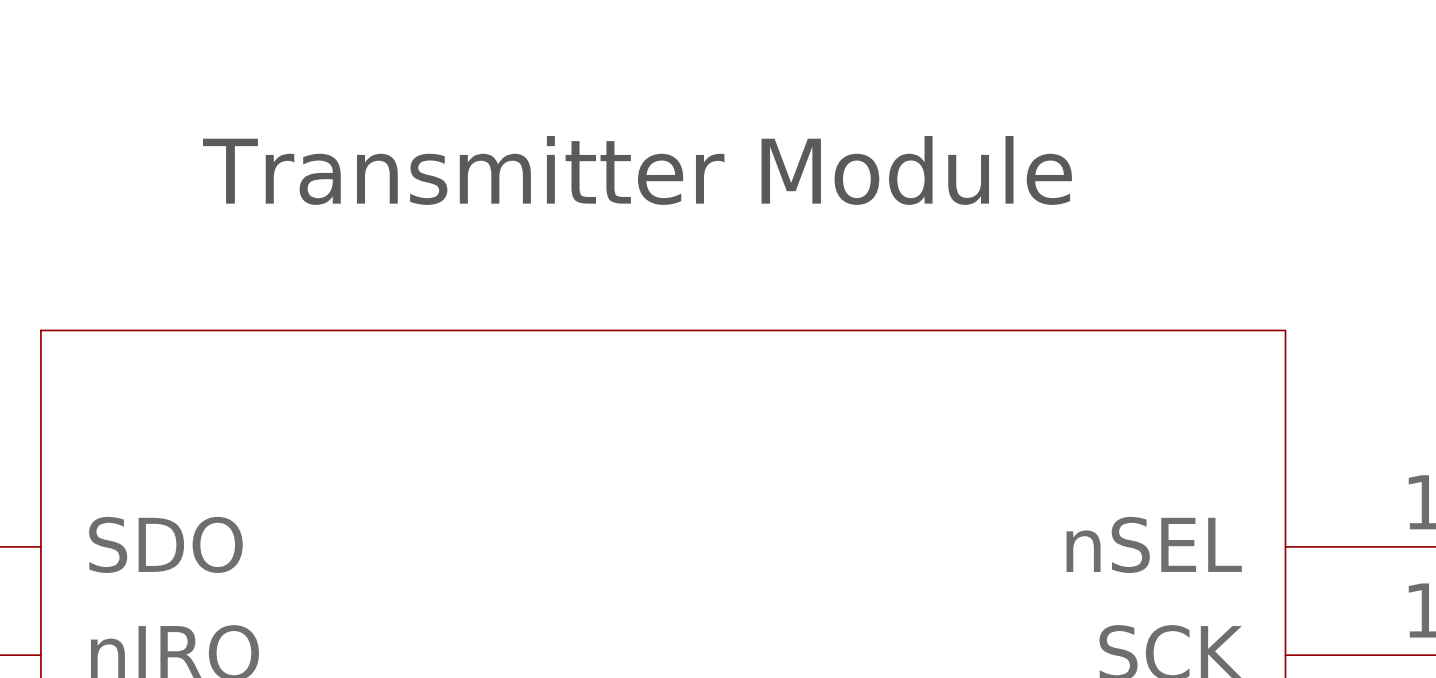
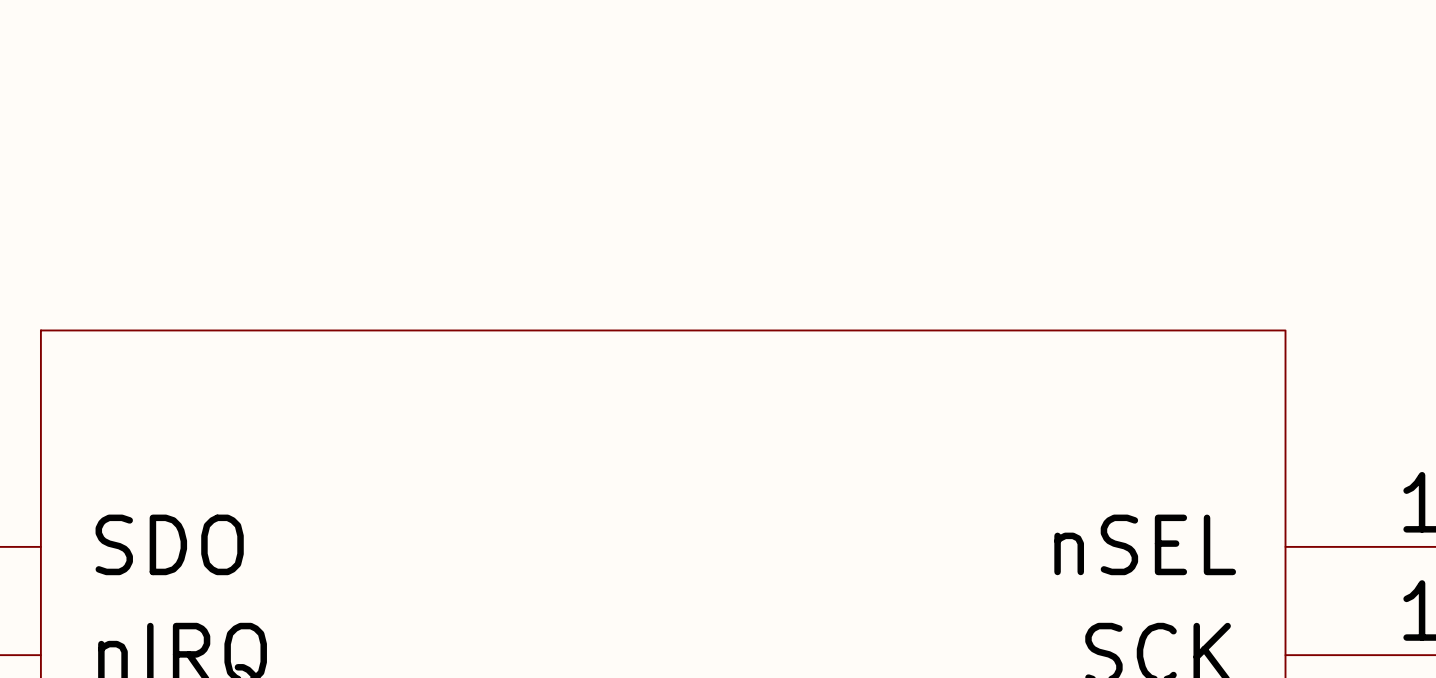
text: Transmitter Module (637, 170) -> none

